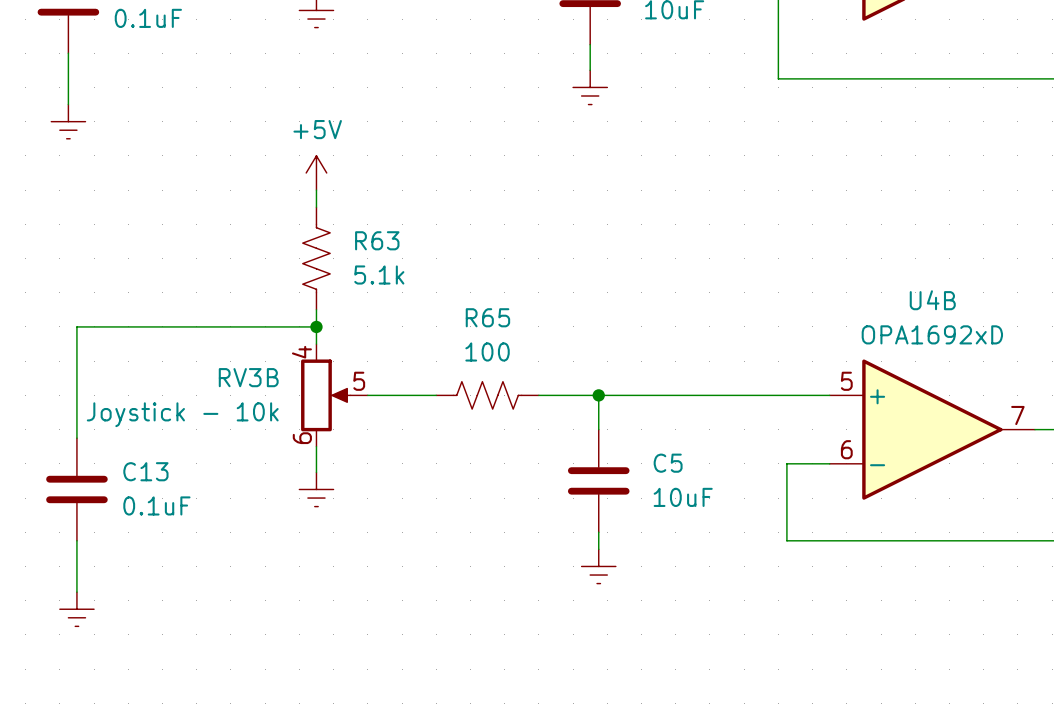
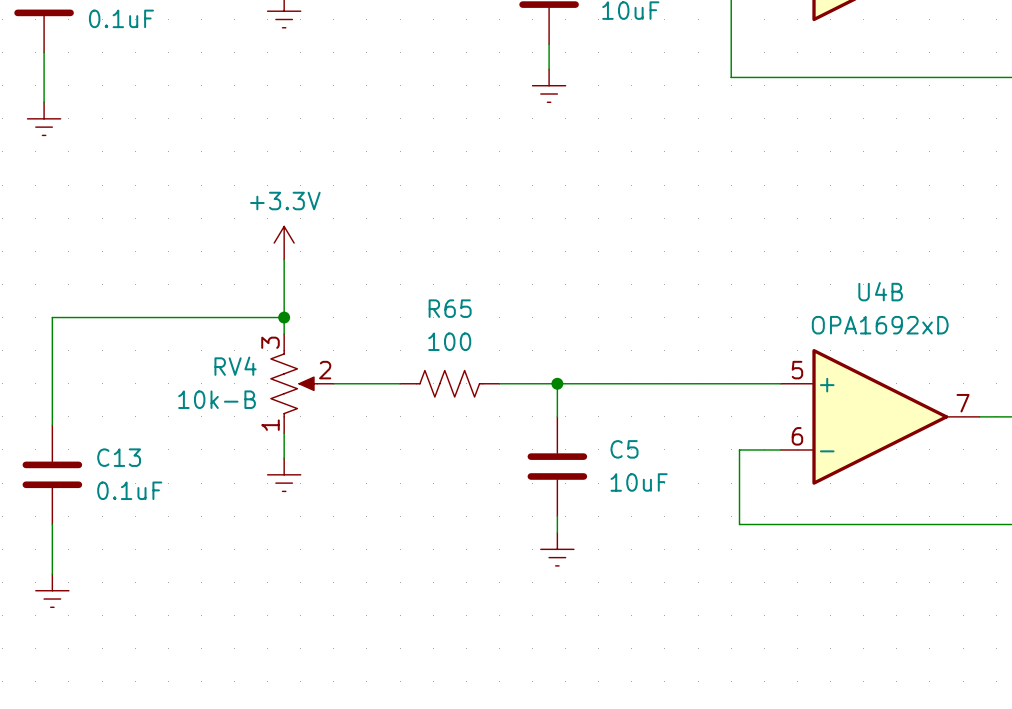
power symbol: +5V (316, 172) -> none
wire: (316, 190) (316, 207) -> none
power symbol: none -> +3.3V (284, 243)
R63: 5.1k (316, 258) -> none
RV3B: Joystick - 10k (334, 395) -> none
RV4: none -> 10k-B (302, 383)

